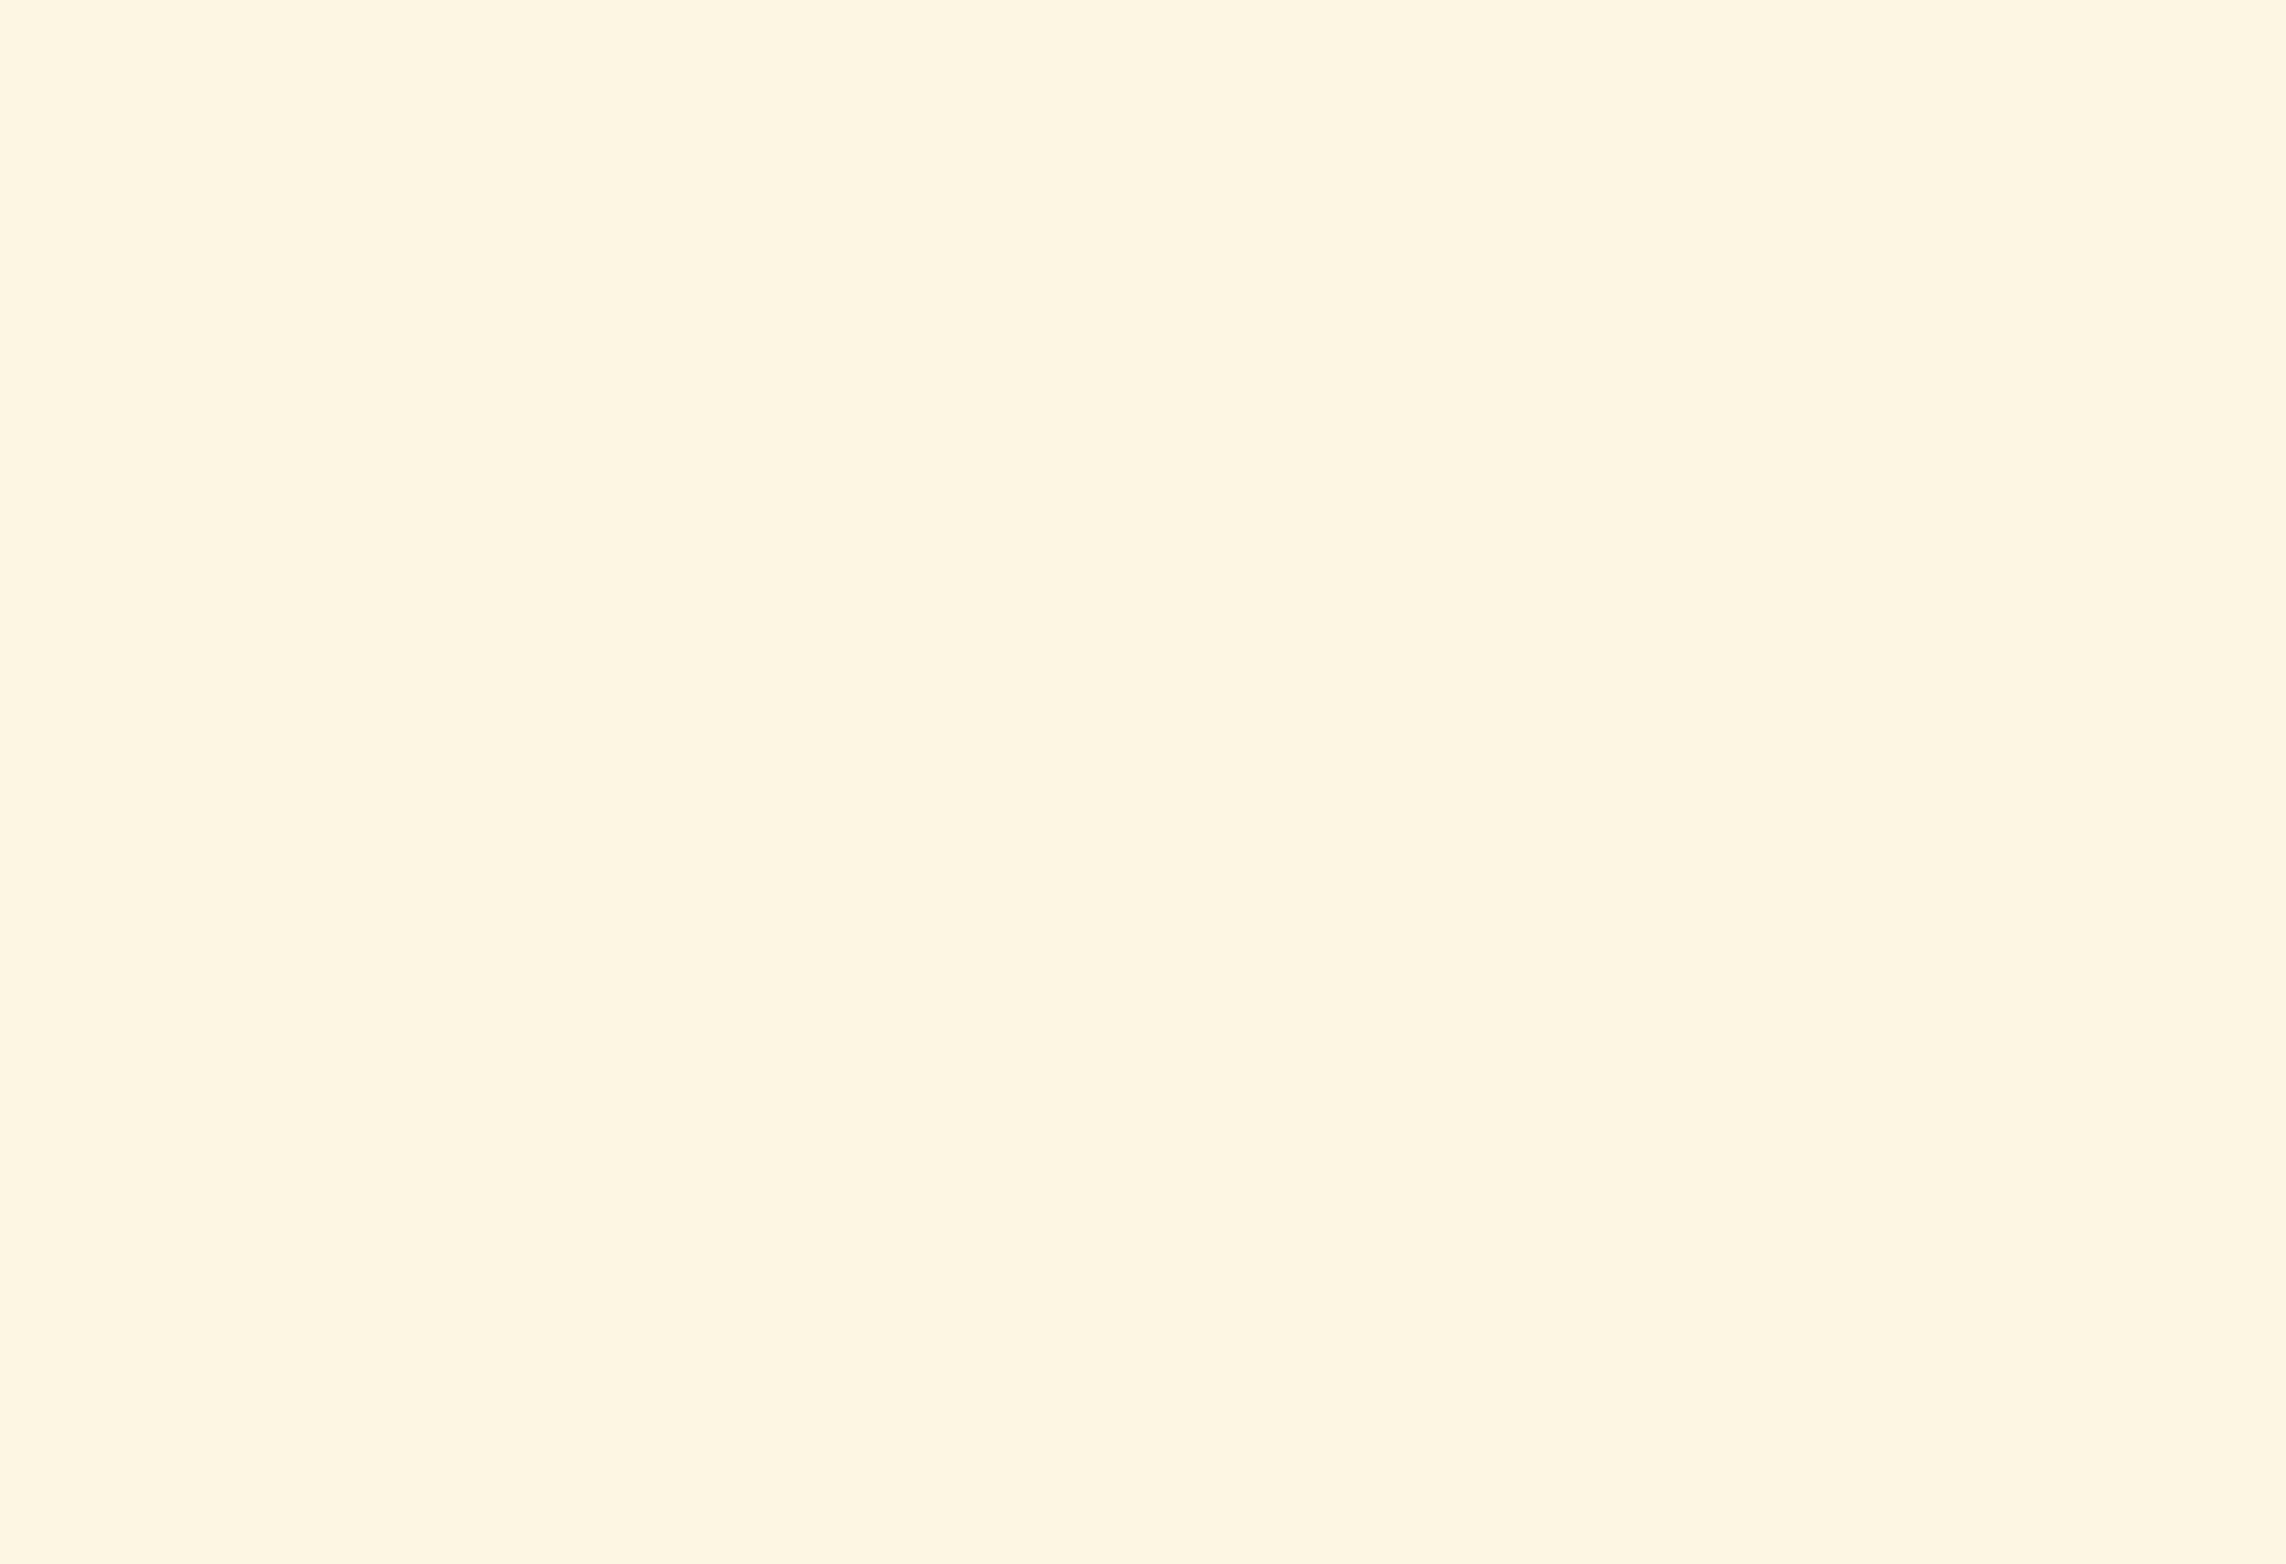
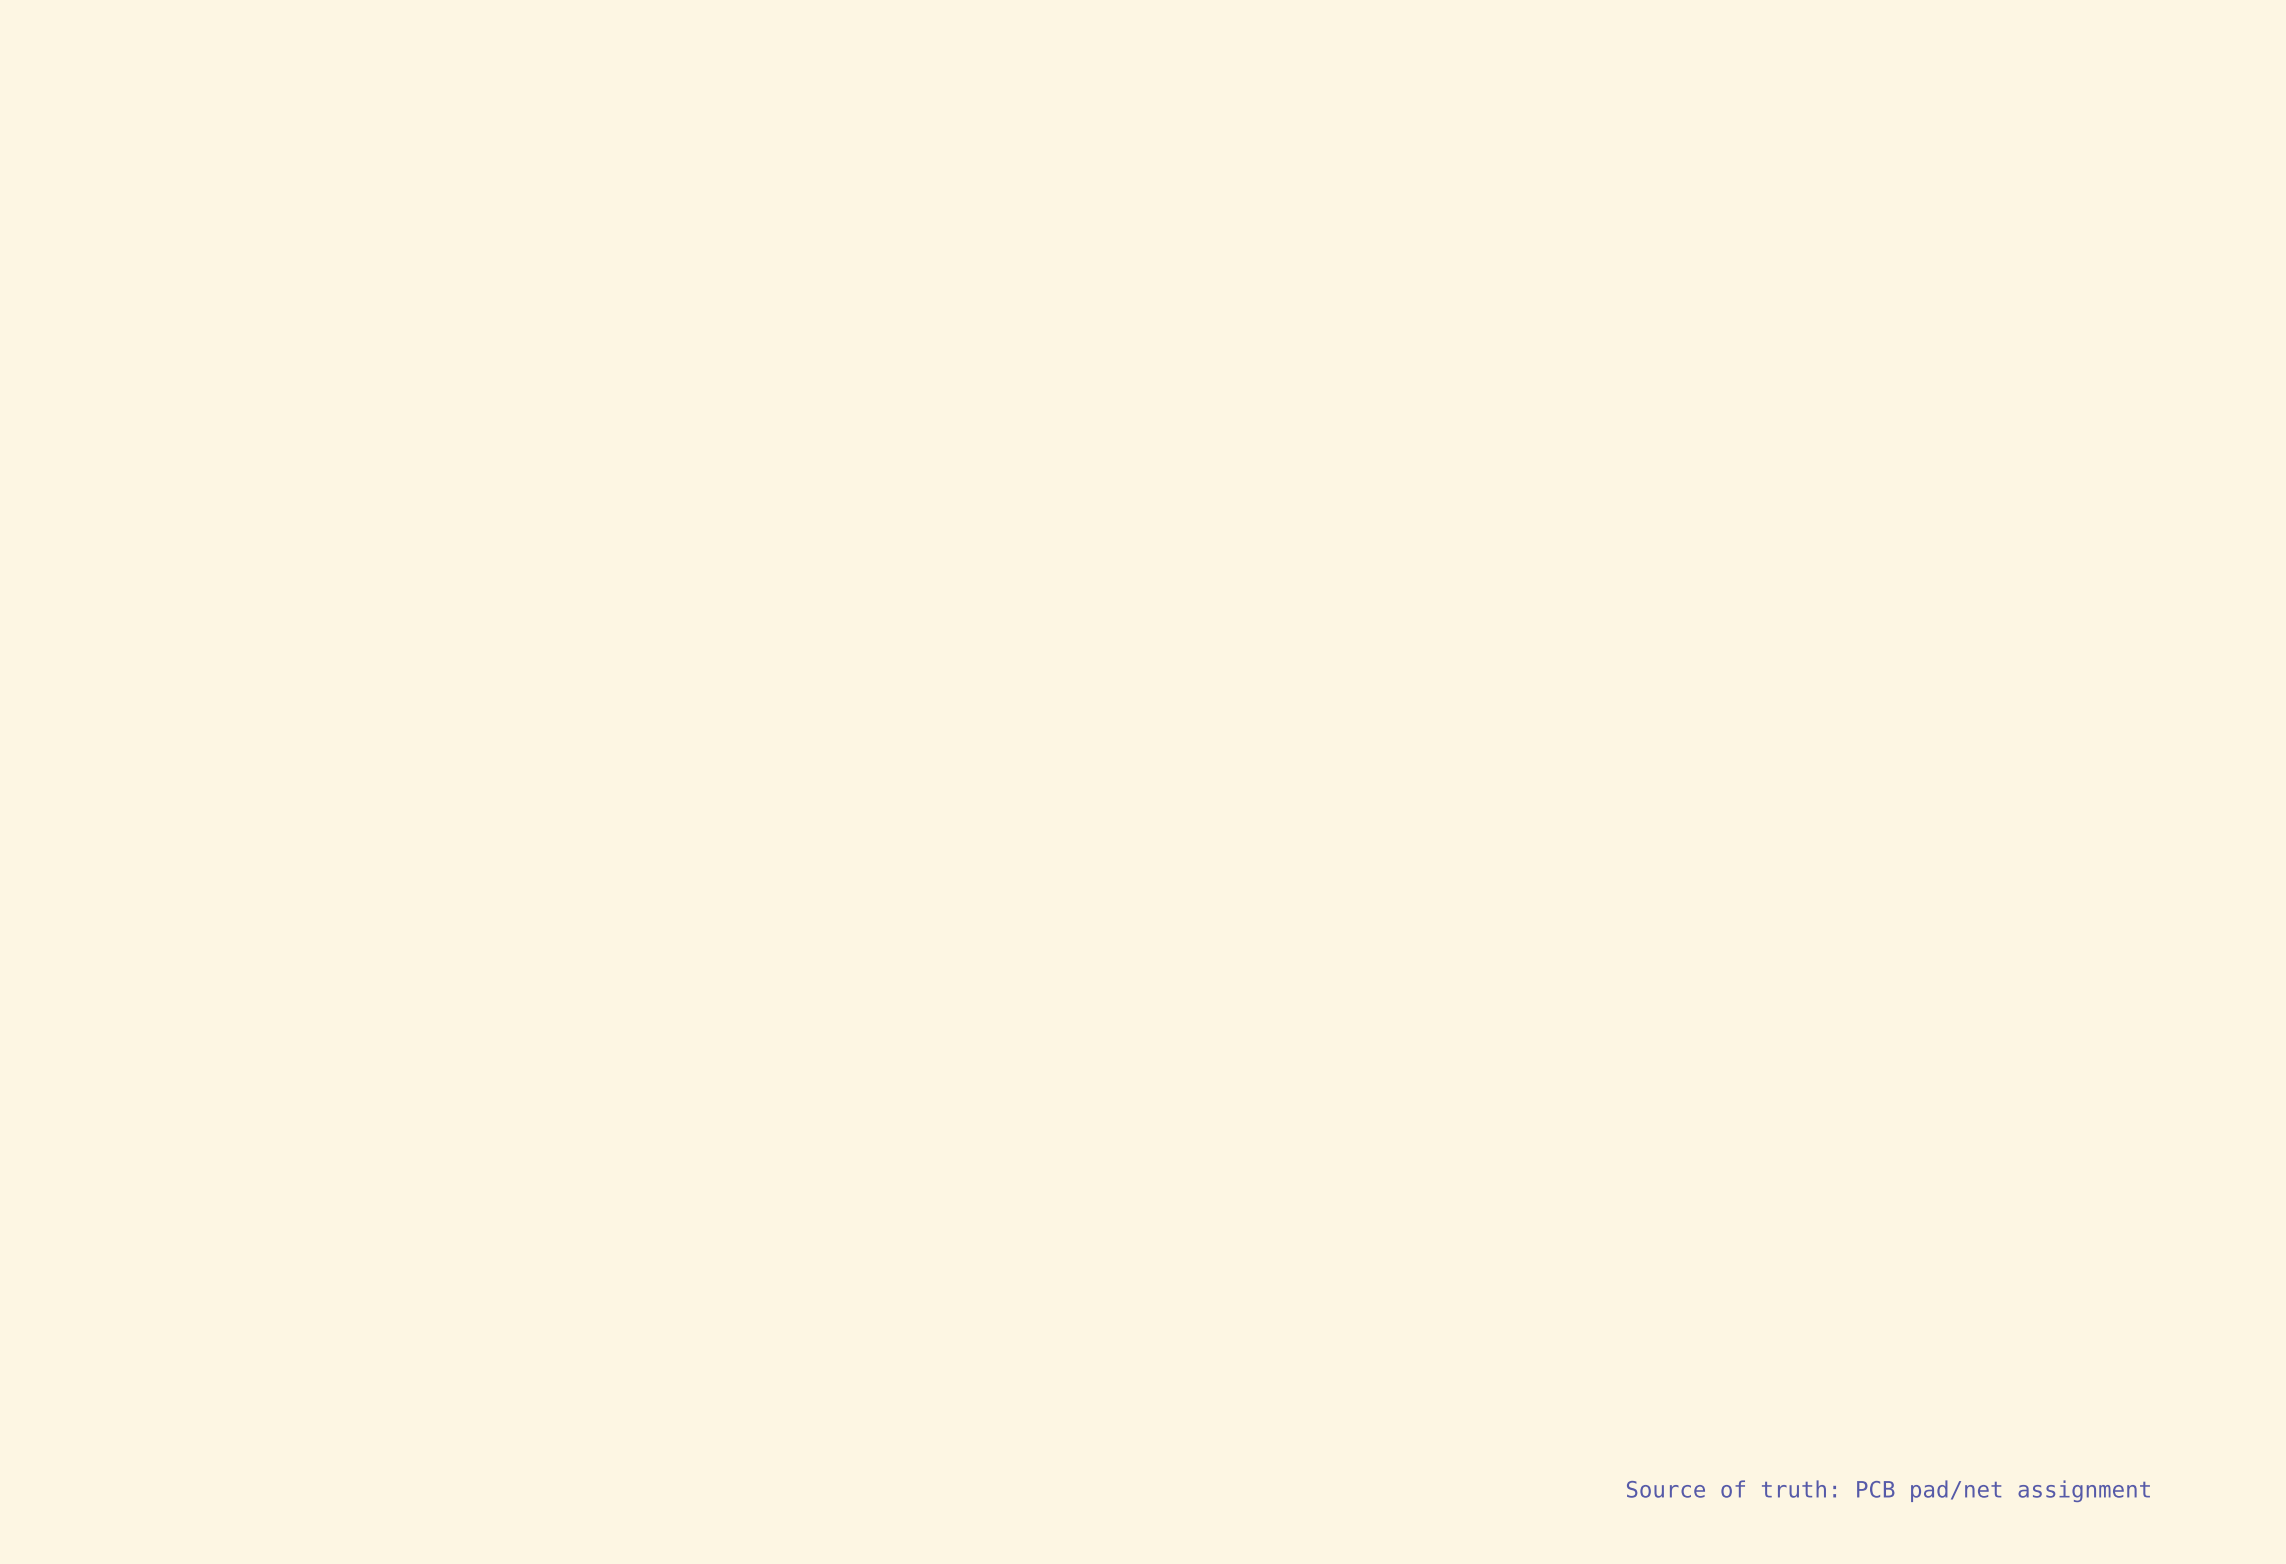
text: none -> Source of truth: PCB pad/net assignment (1888, 1491)

